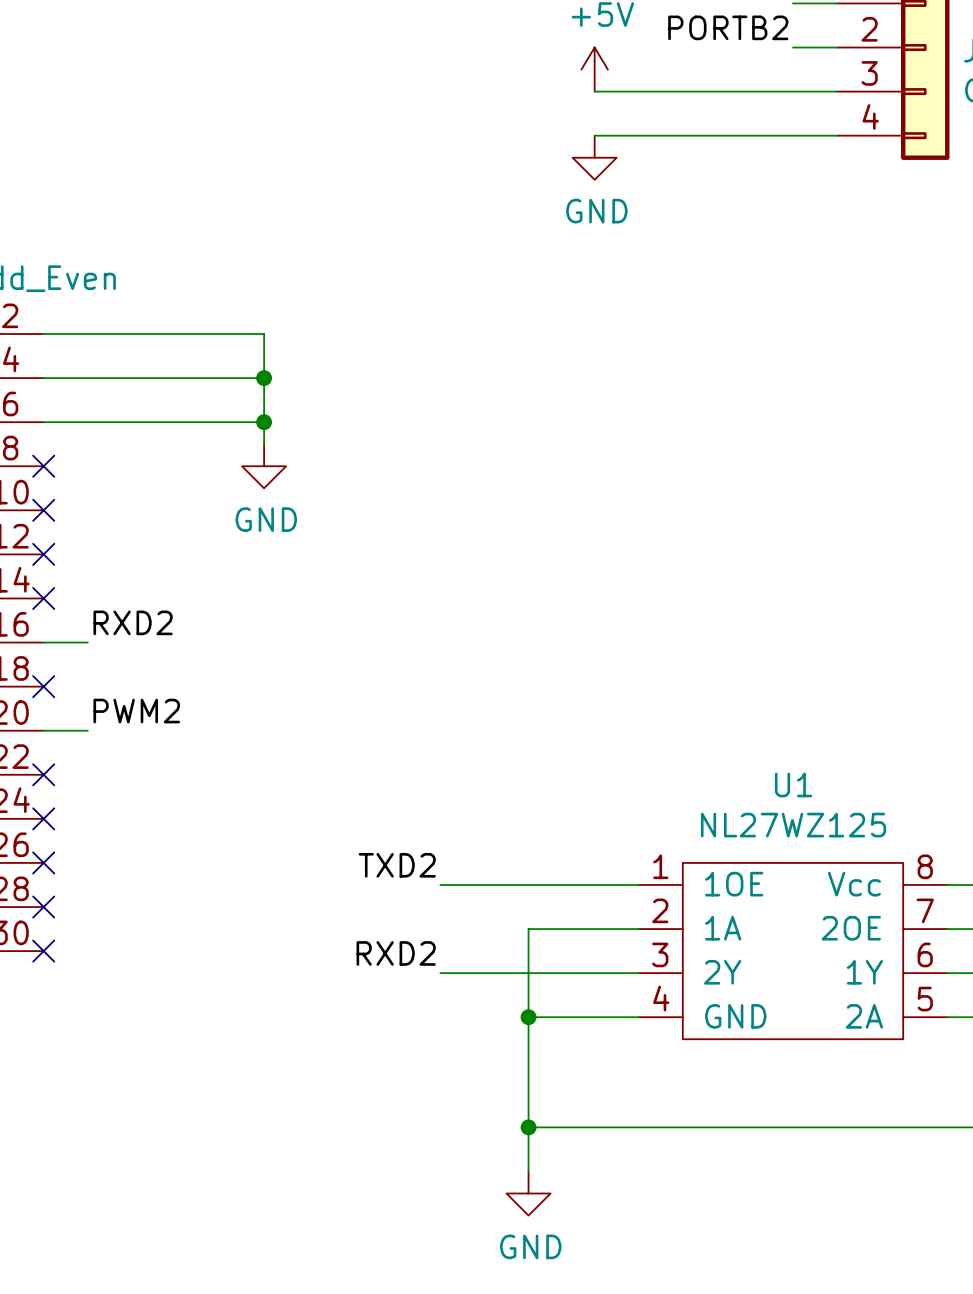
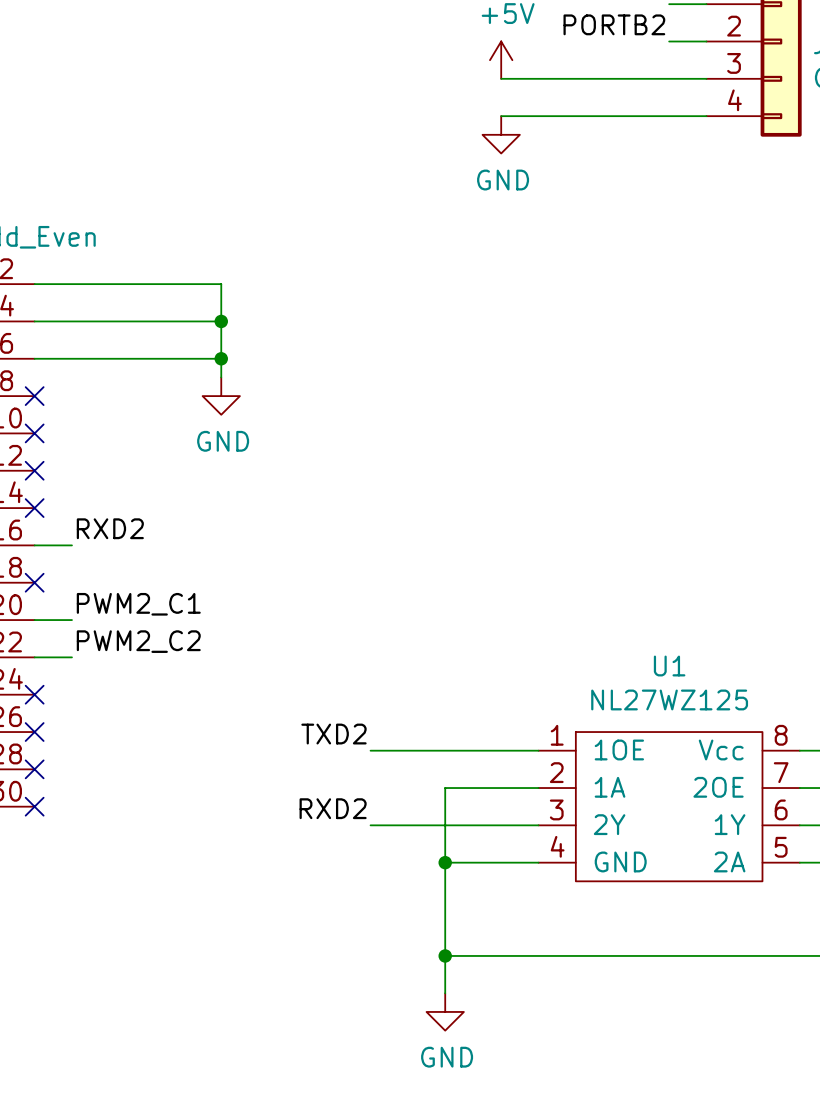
label: PWM2 (136, 711) -> PWM2_C1 (138, 604)
label: none -> PWM2_C2 (138, 641)
wire: none -> (34, 657) (71, 657)
no-connect mark: (43, 774) -> none

